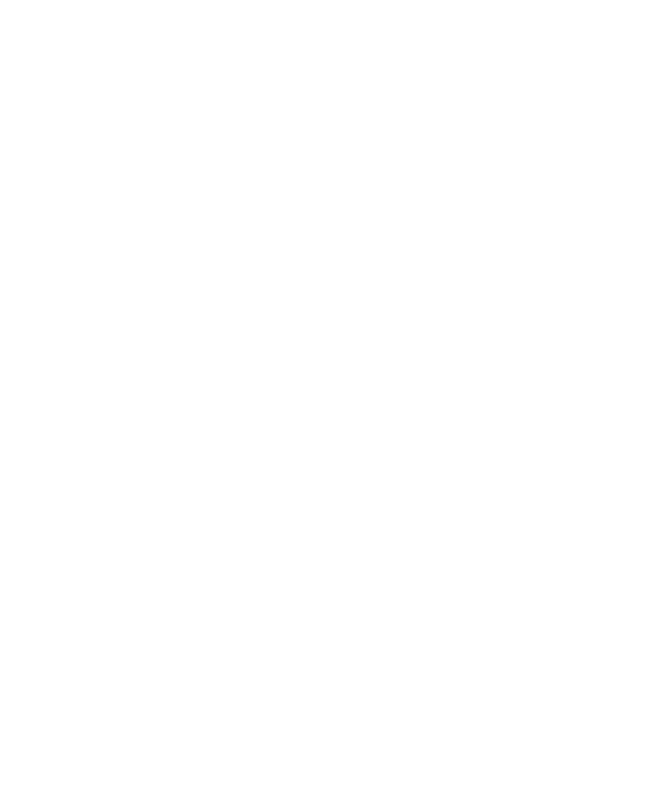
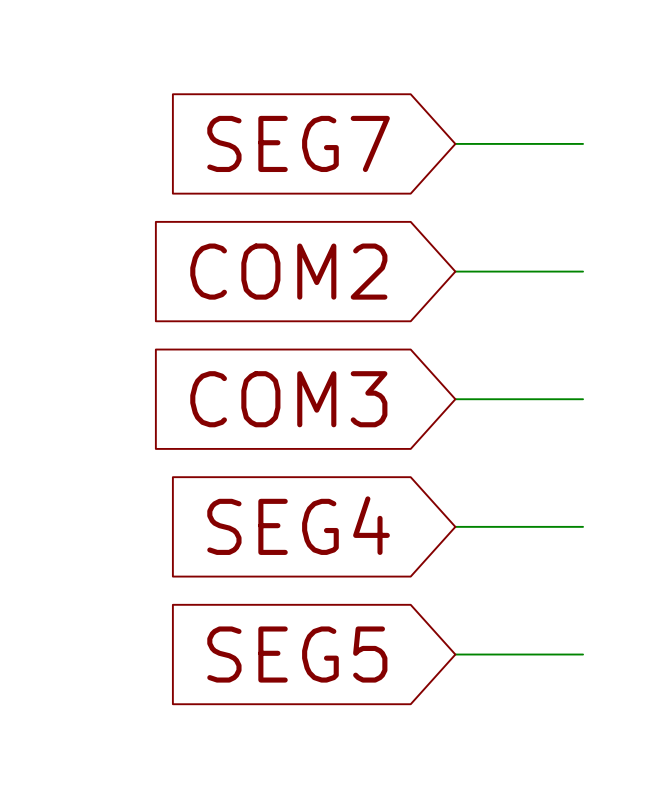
global label: none -> SEG7 (298, 143)
wire: none -> (455, 143) (583, 143)
global label: none -> COM2 (288, 271)
wire: none -> (455, 271) (583, 271)
global label: none -> COM3 (288, 399)
wire: none -> (455, 399) (583, 399)
global label: none -> SEG4 (298, 525)
wire: none -> (455, 526) (583, 526)
global label: none -> SEG5 (297, 654)
wire: none -> (455, 654) (583, 654)

